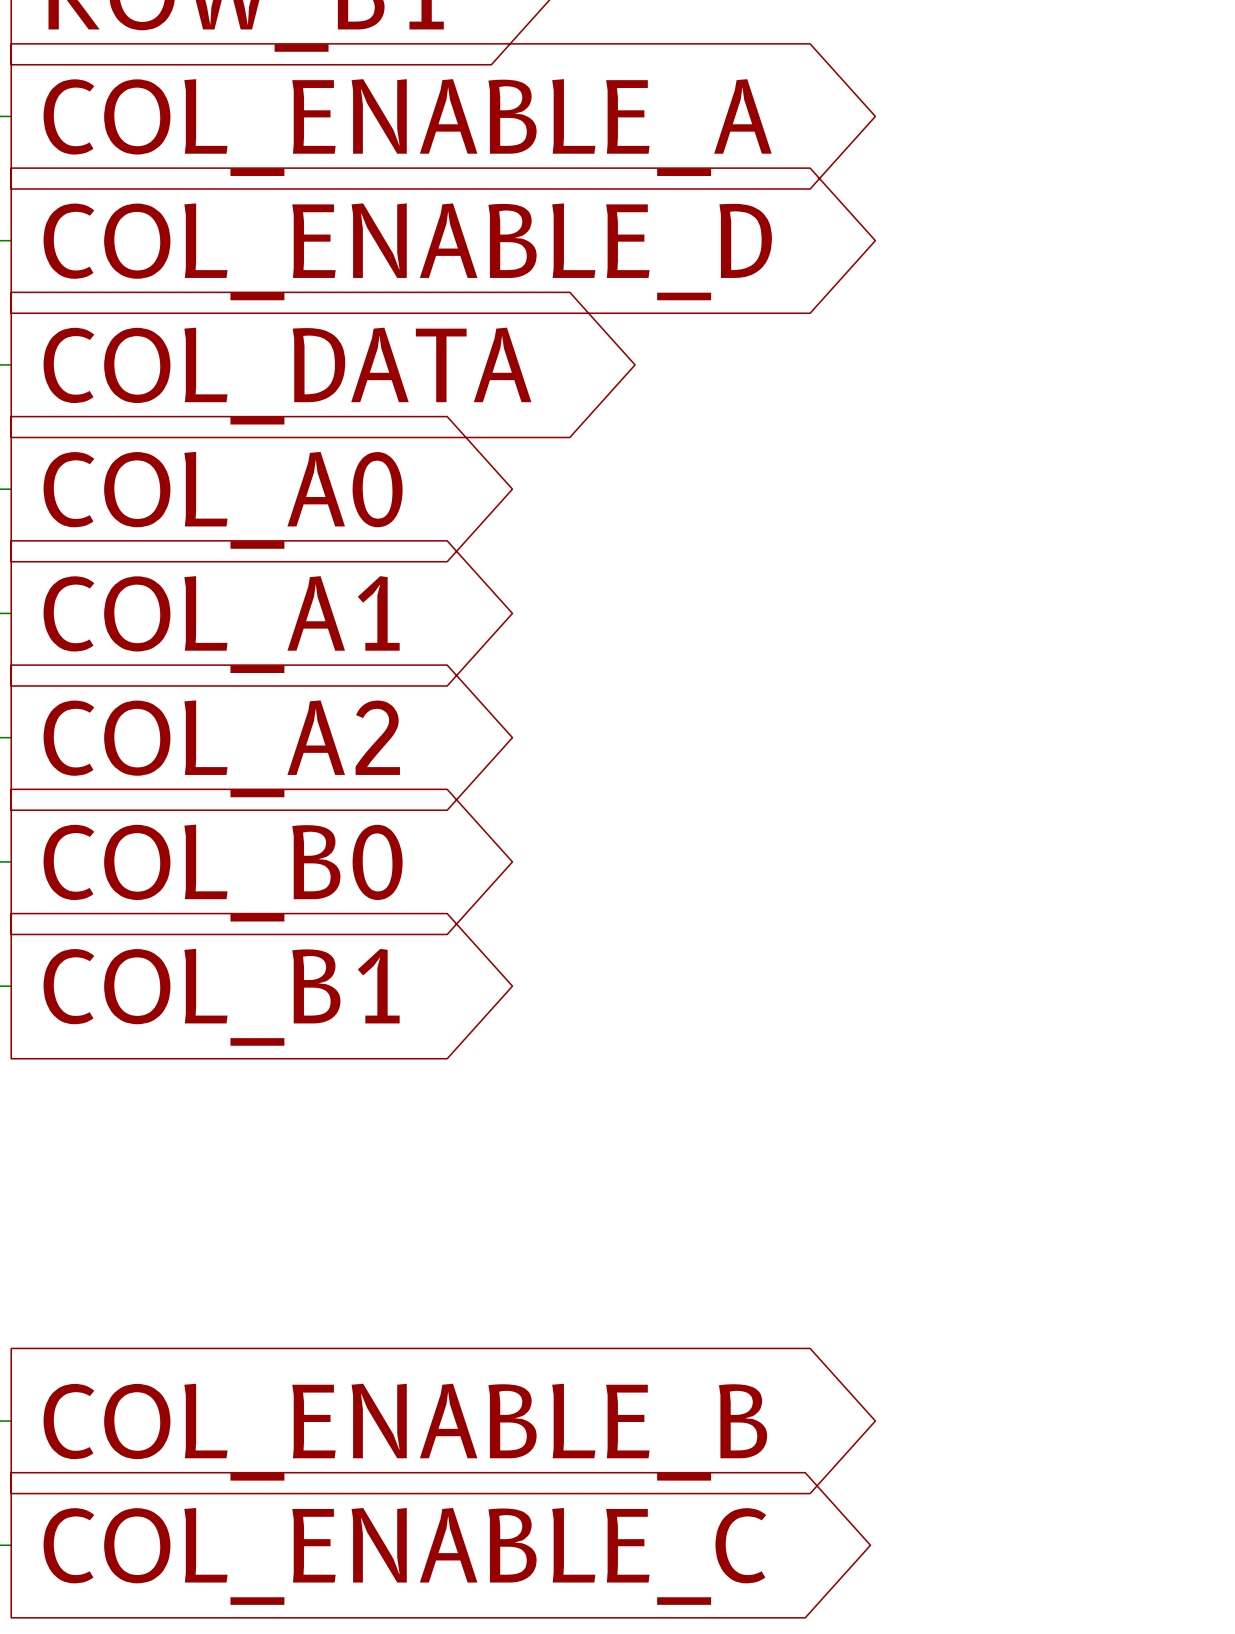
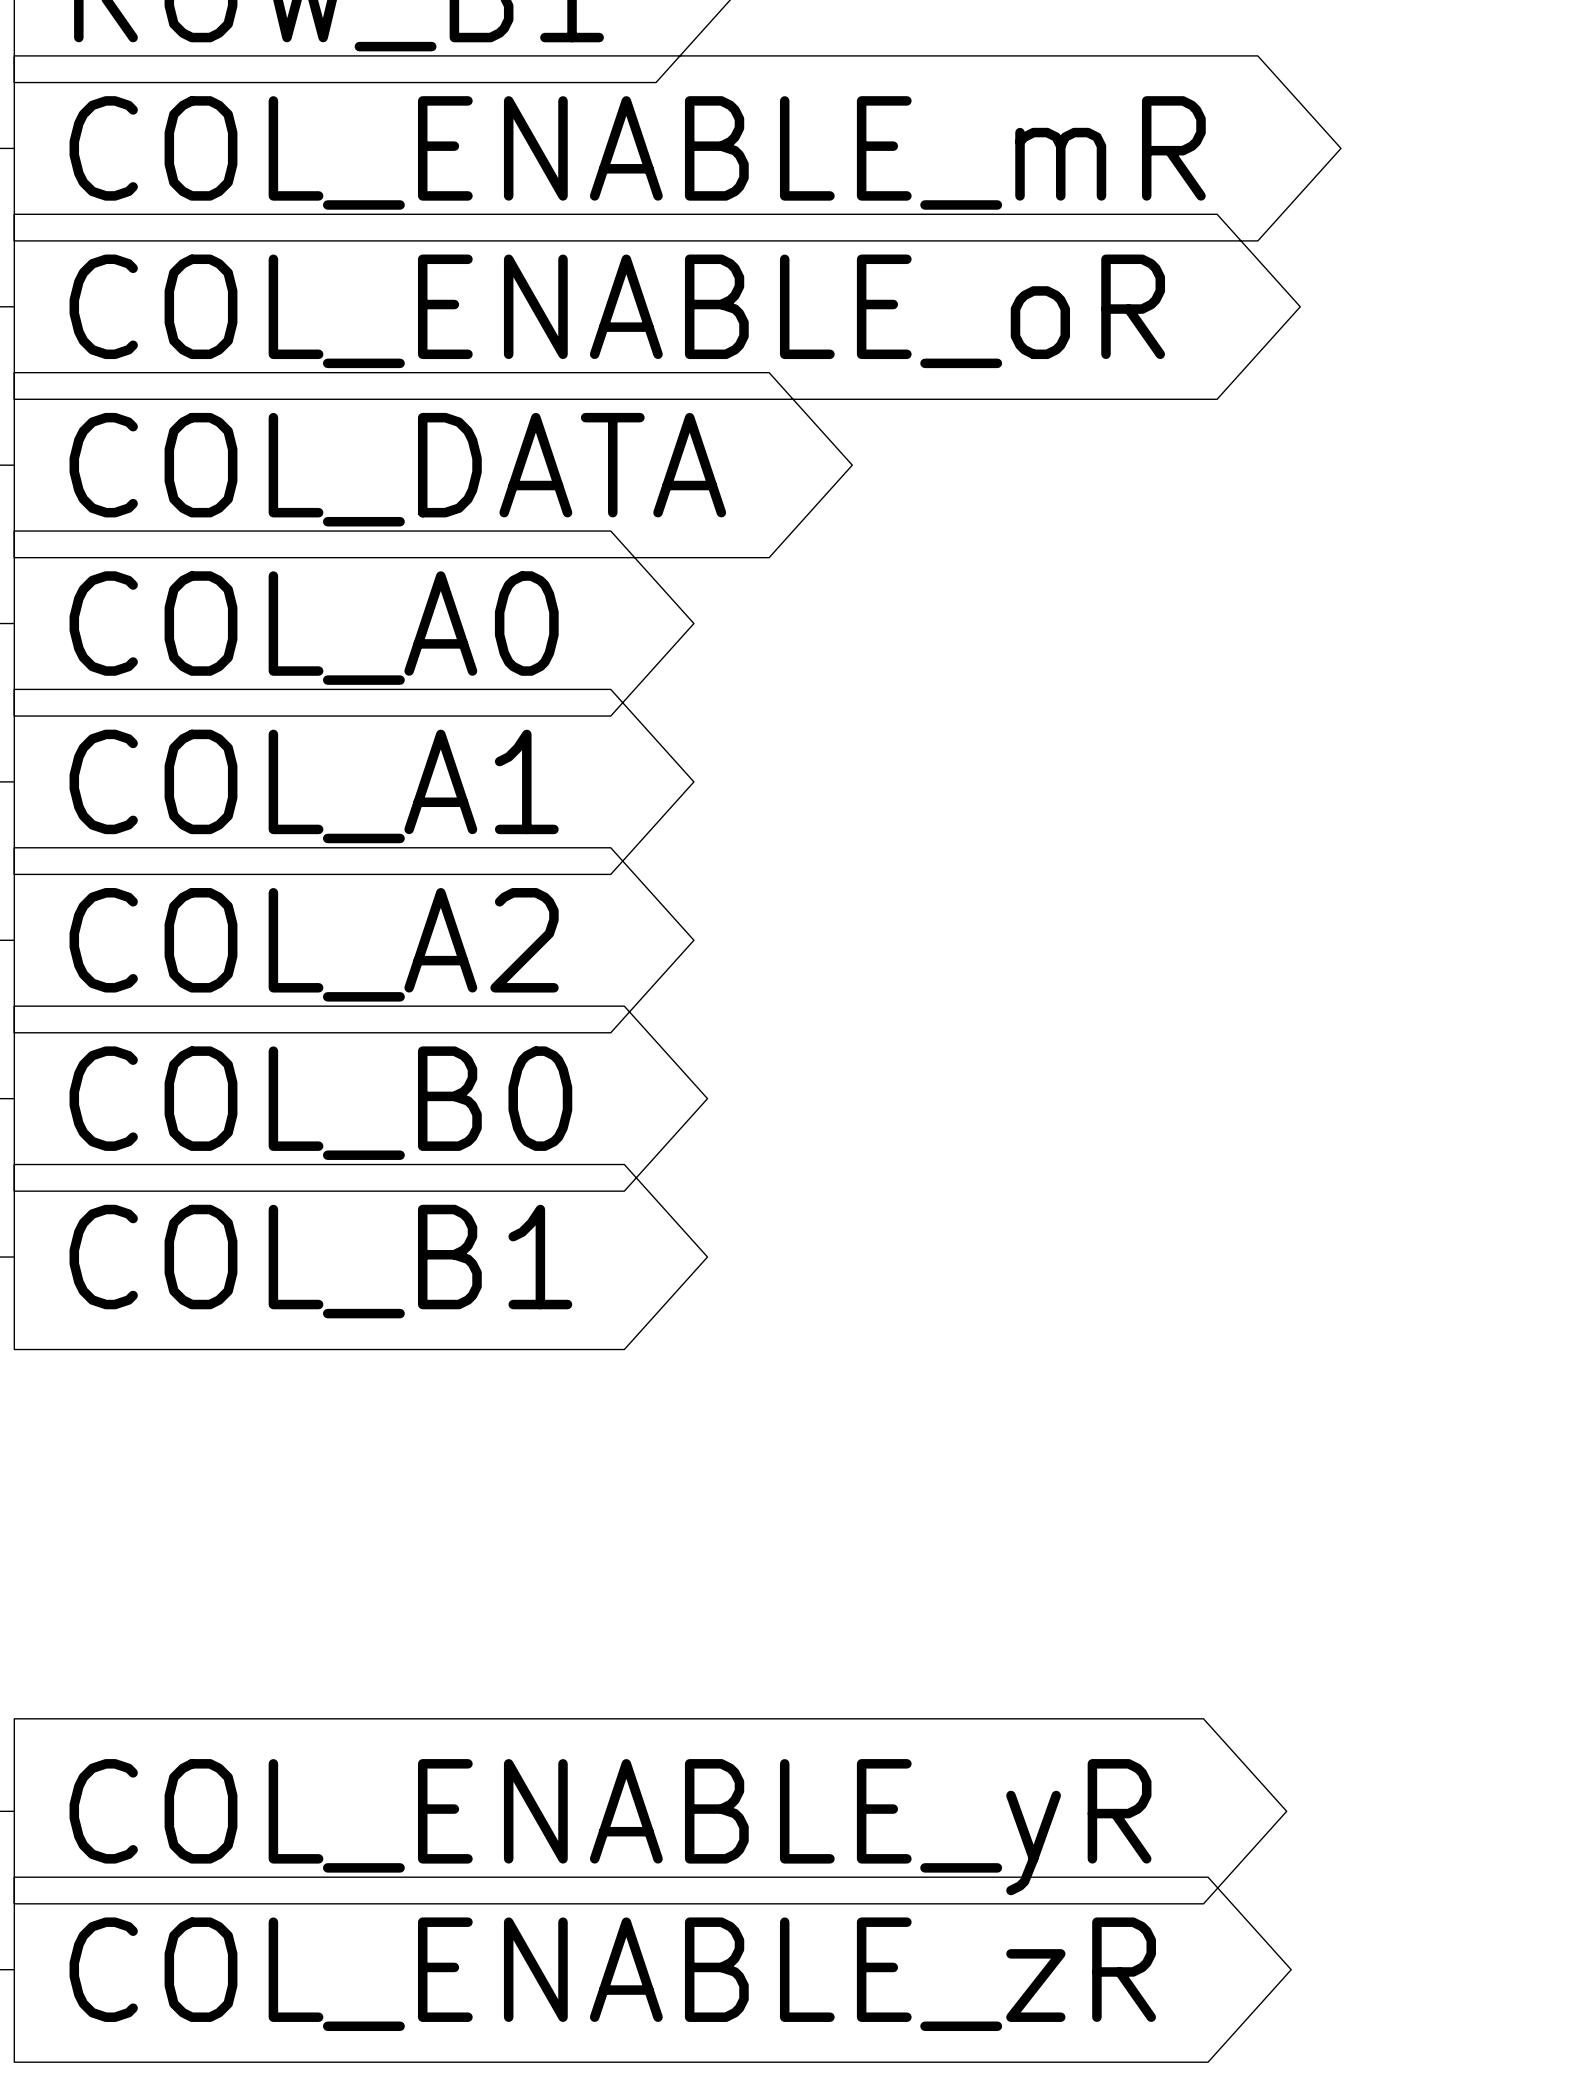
global label: COL_ENABLE_A (407, 127) -> COL_ENABLE_mR (637, 152)
global label: COL_ENABLE_D (407, 251) -> COL_ENABLE_oR (617, 311)
global label: COL_ENABLE_B (405, 1432) -> COL_ENABLE_yR (610, 1827)
global label: COL_ENABLE_C (404, 1556) -> COL_ENABLE_zR (612, 1974)

